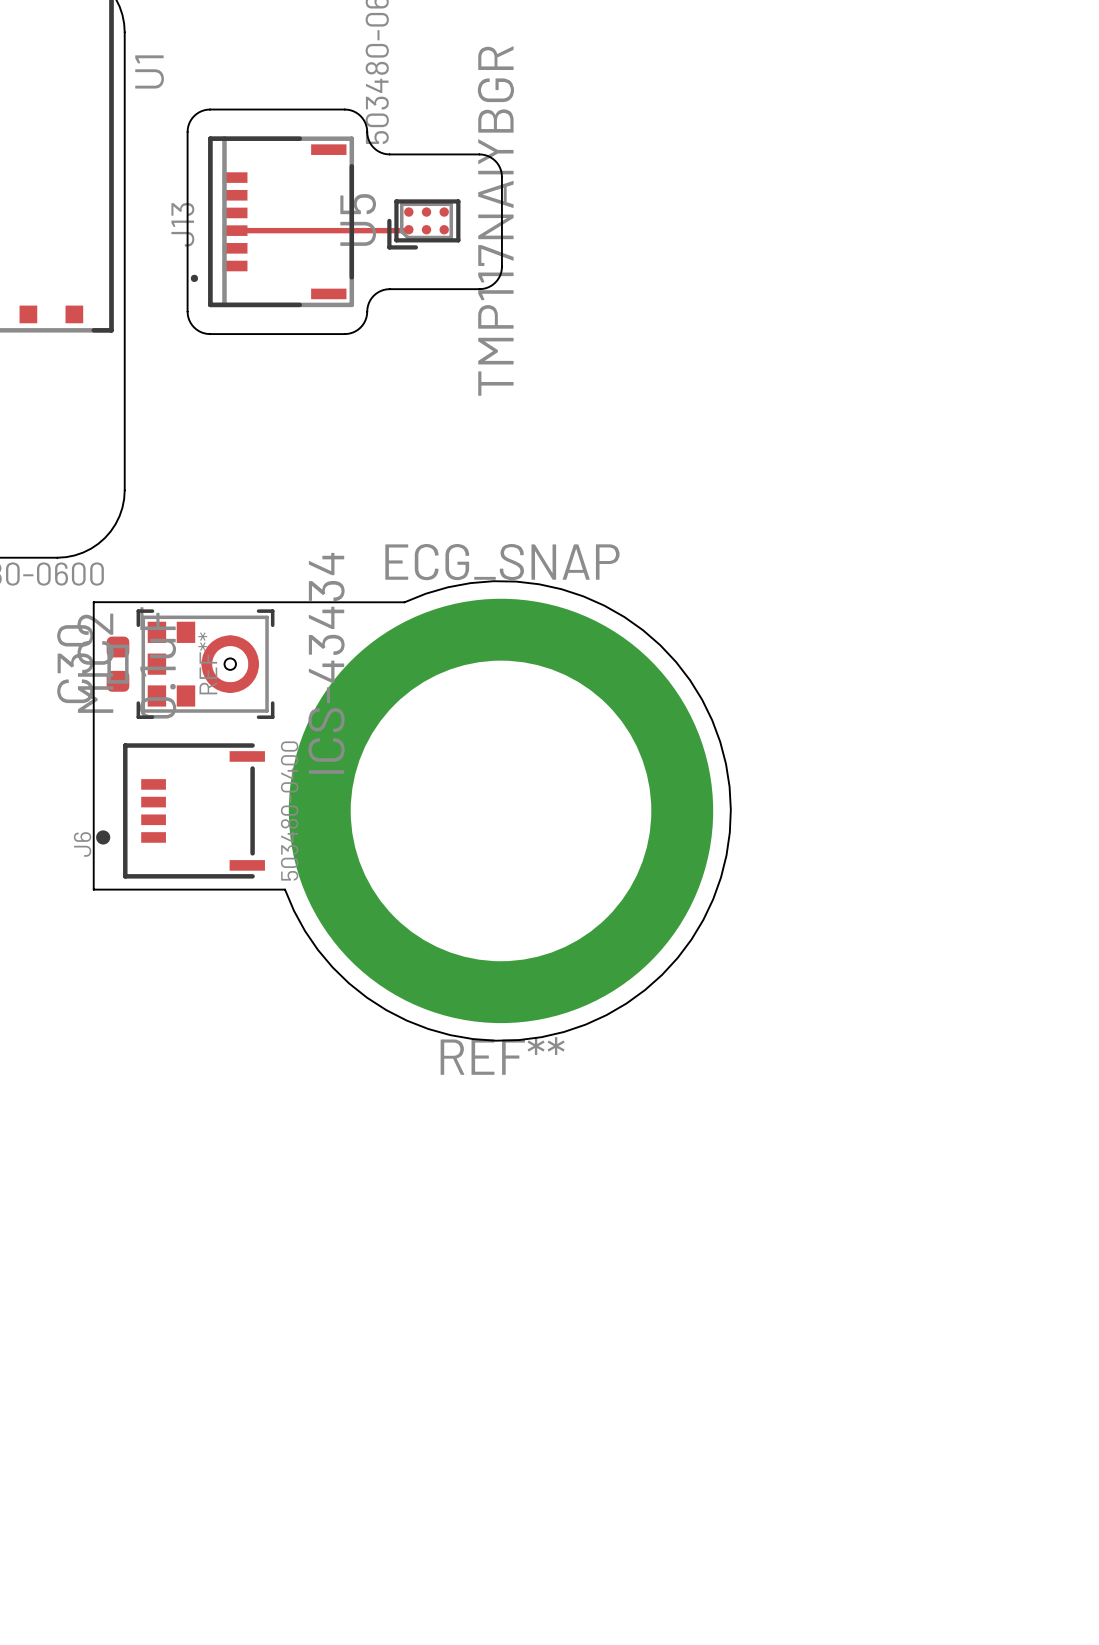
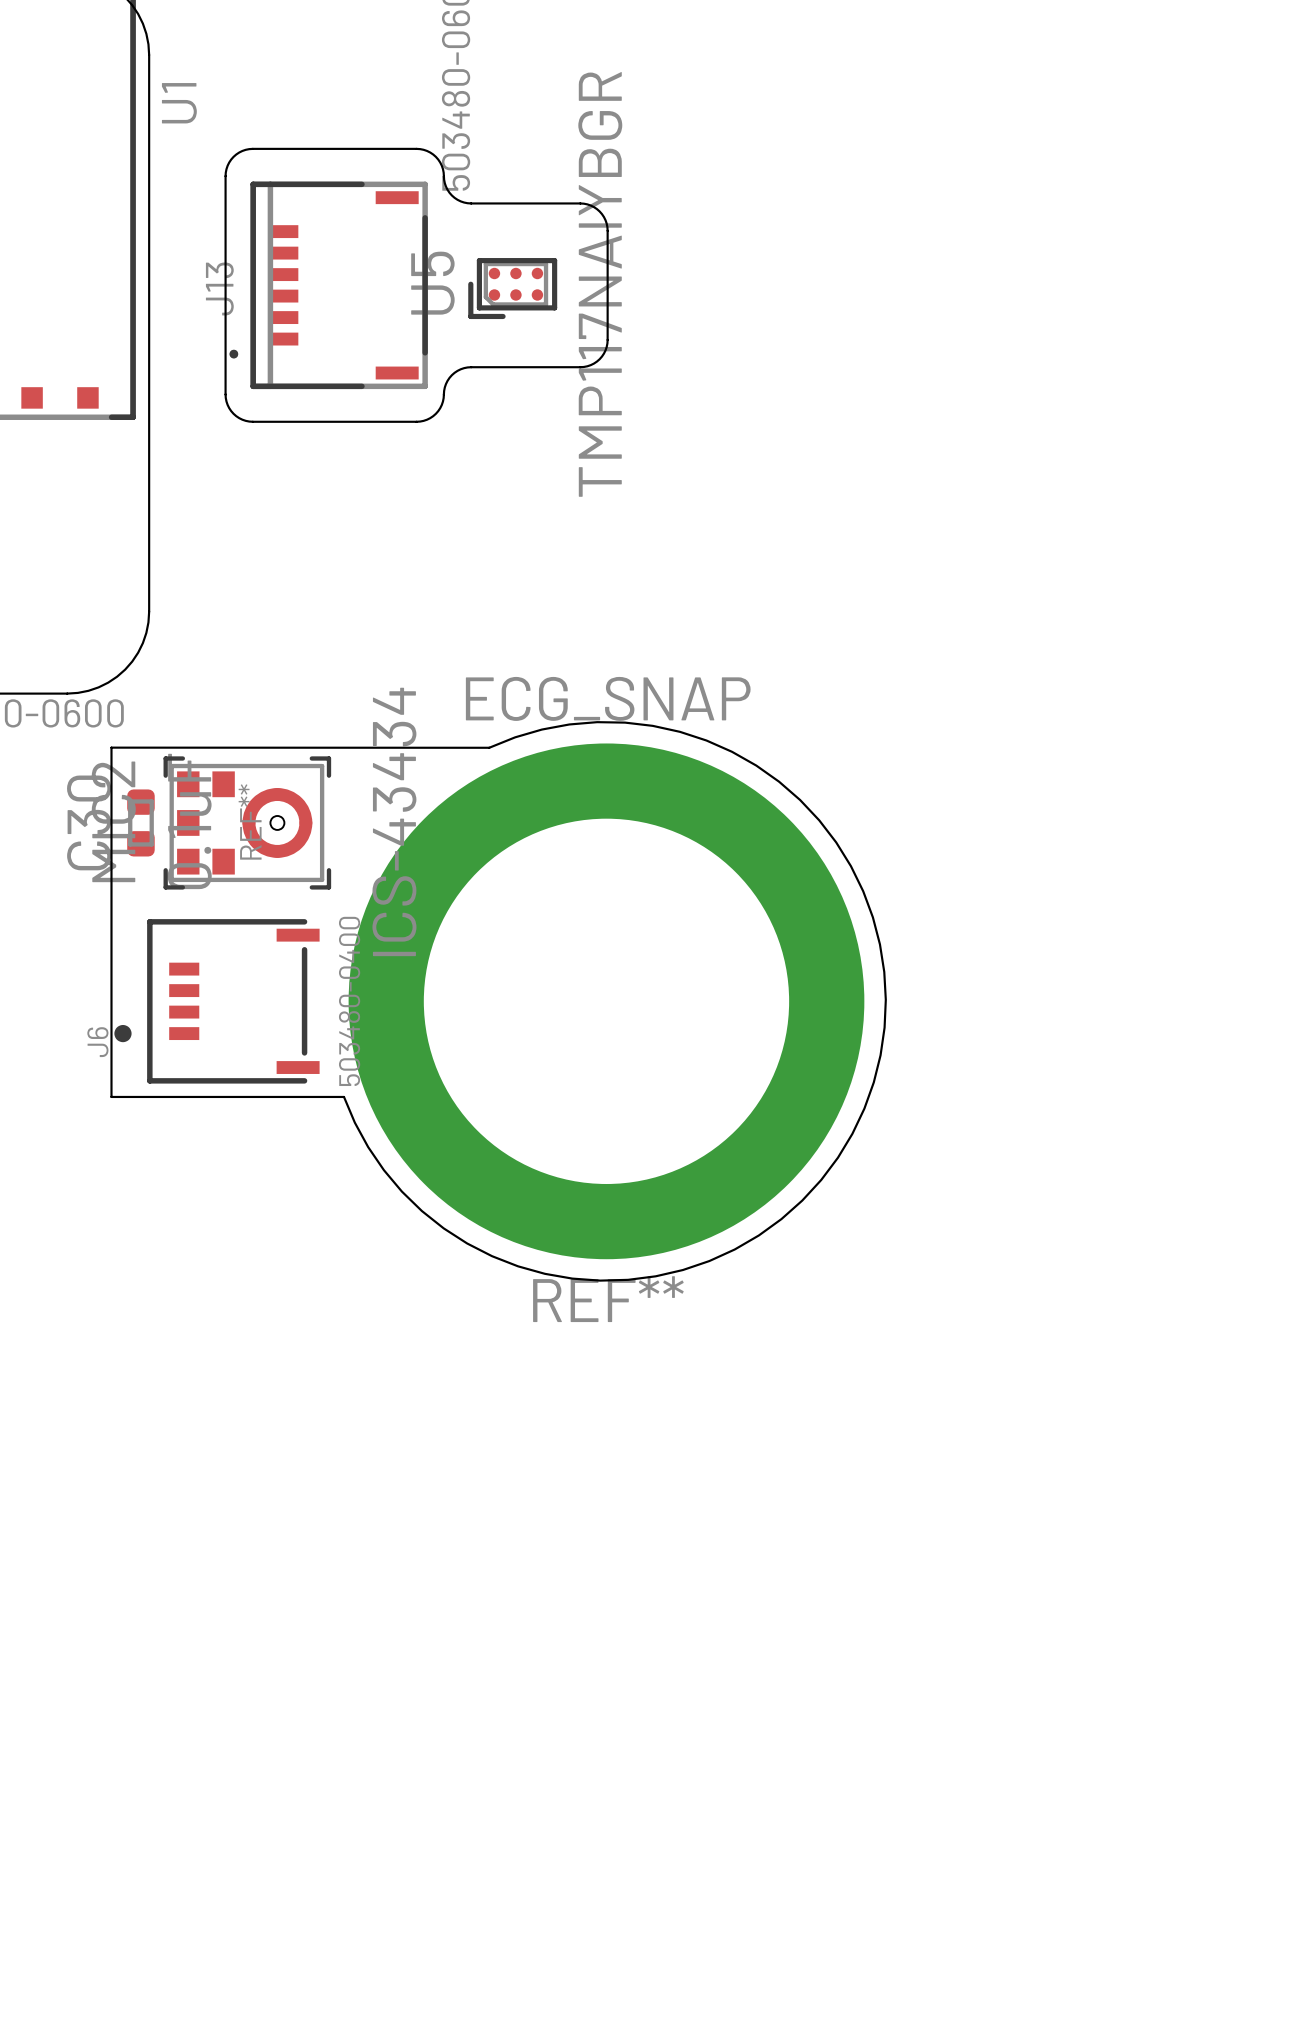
top track: (408, 229) (235, 230) -> none

